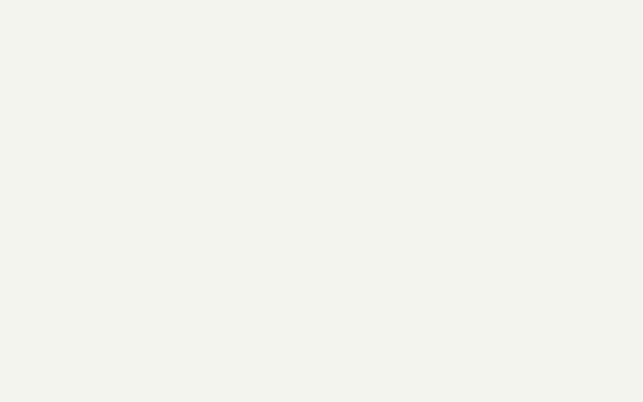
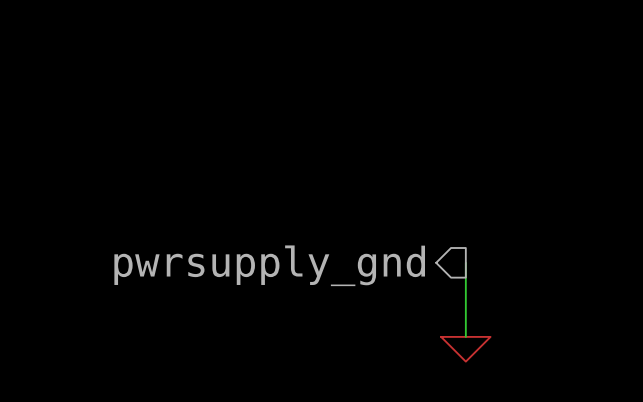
wire: none -> (465, 262) (465, 336)
hierarchical label: none -> pwrsupply_gnd (269, 265)
power symbol: none -> (465, 349)

